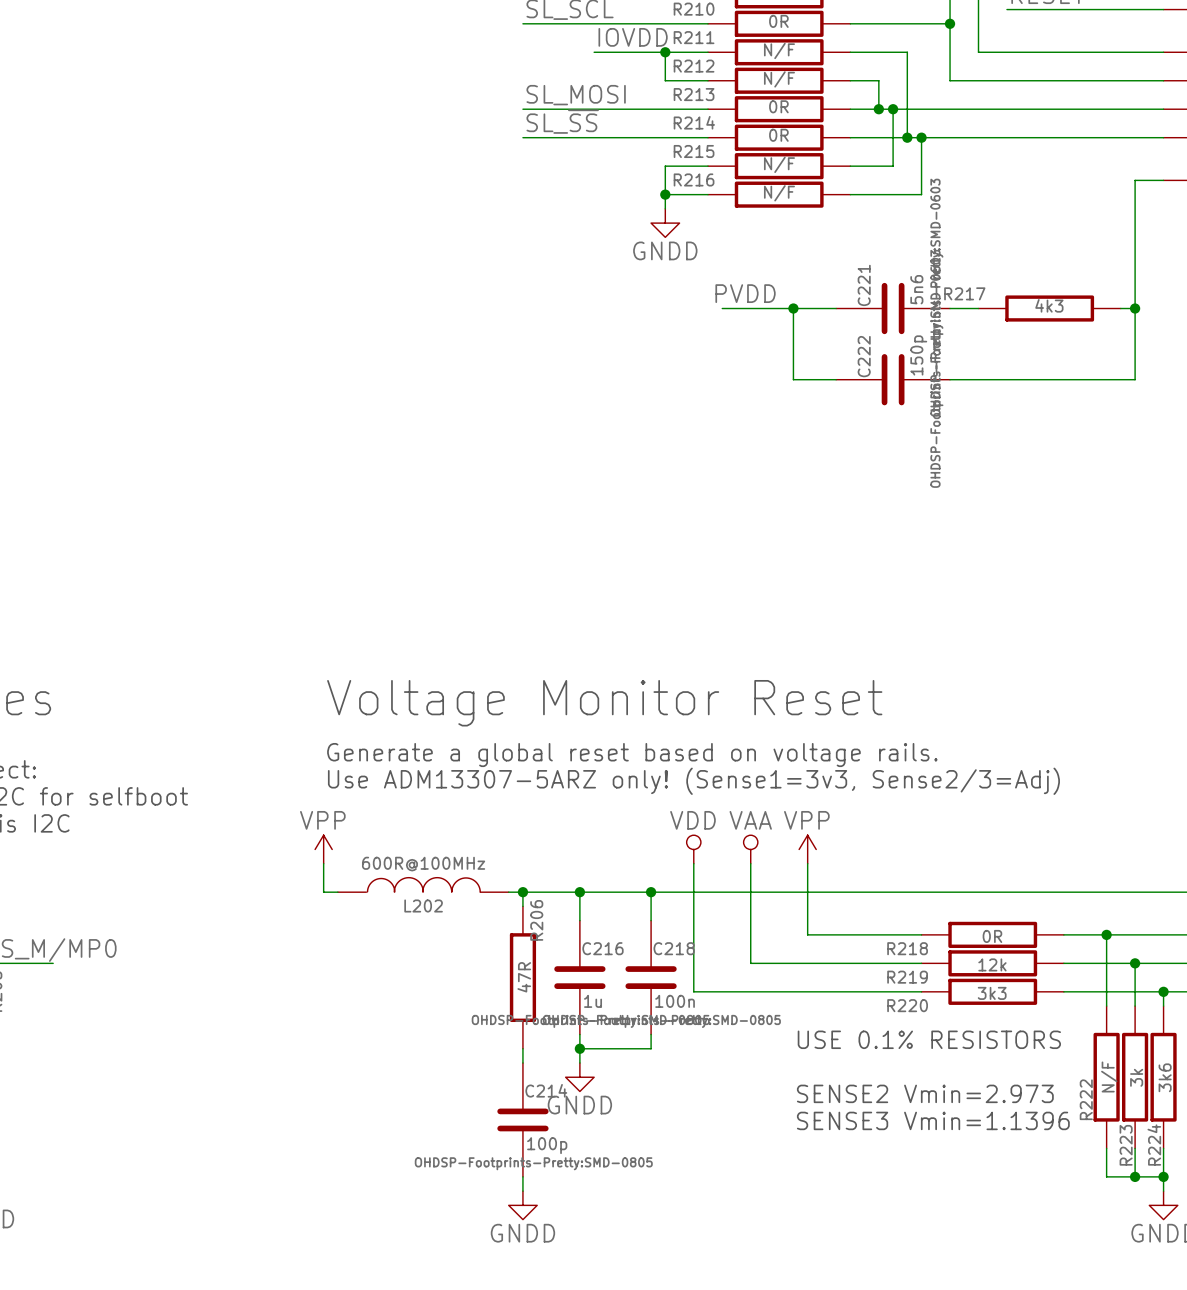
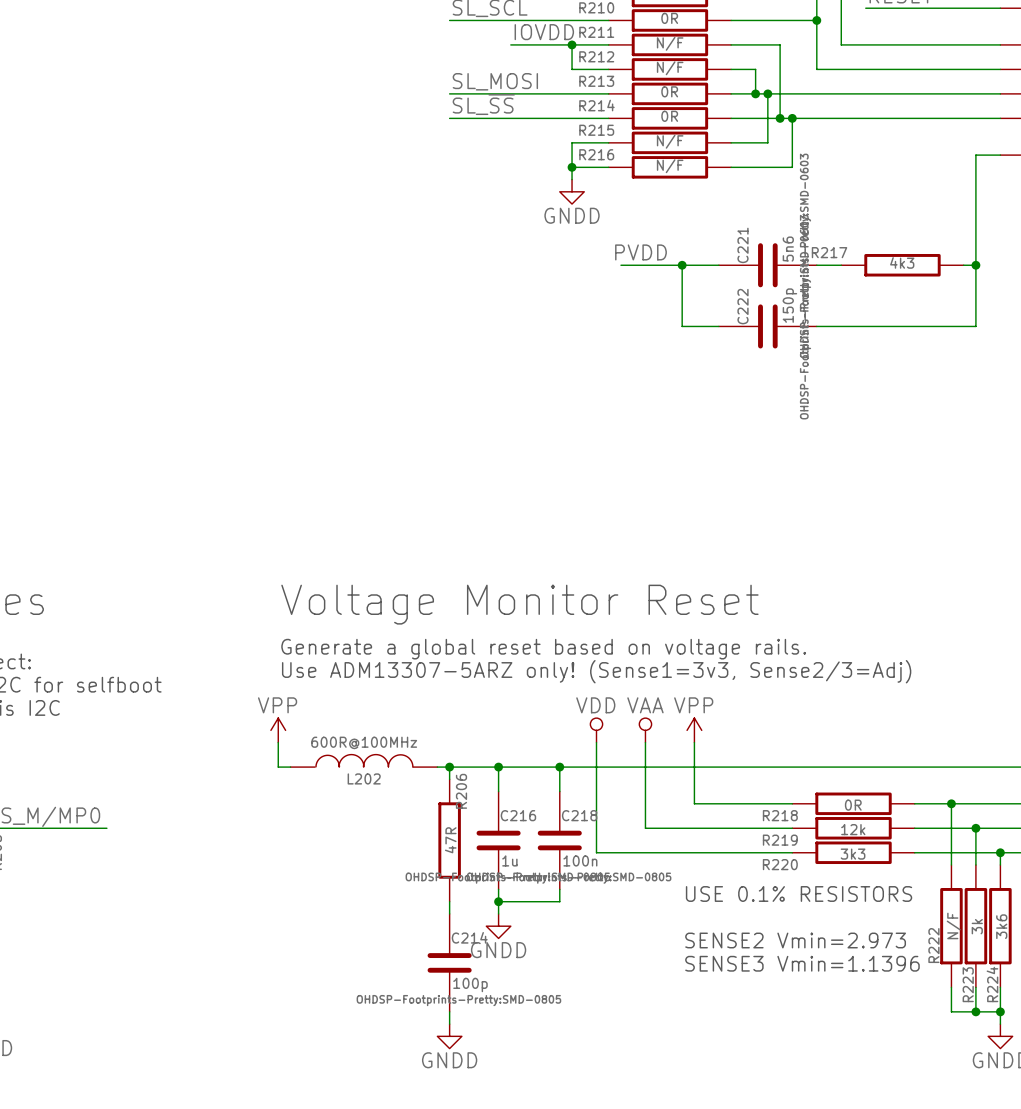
wire: none -> (45, 828) (106, 828)

